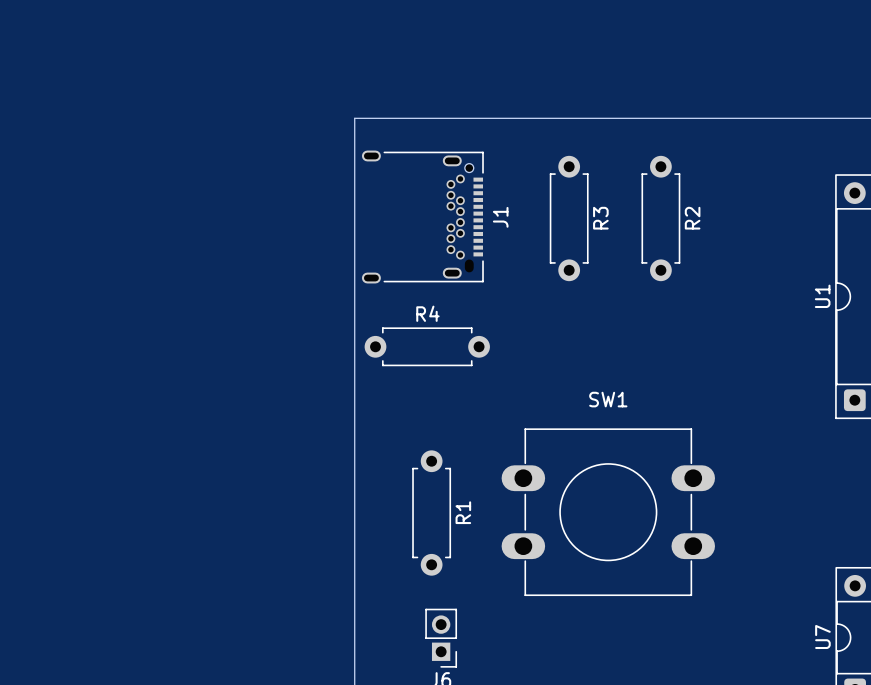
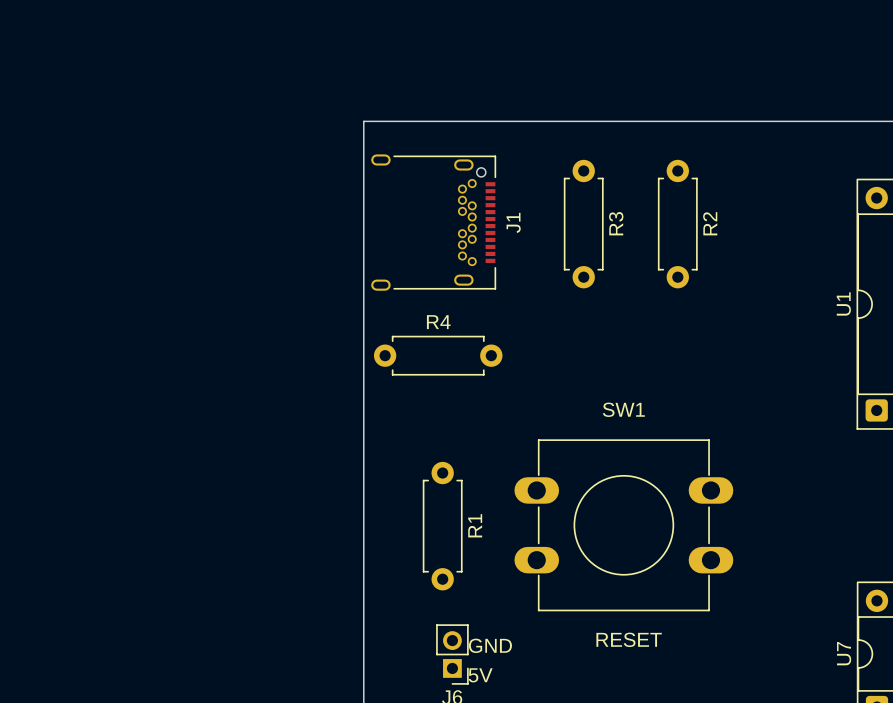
text: none -> RESET (629, 639)
text: none -> GND (490, 645)
text: none -> 5V (480, 675)

